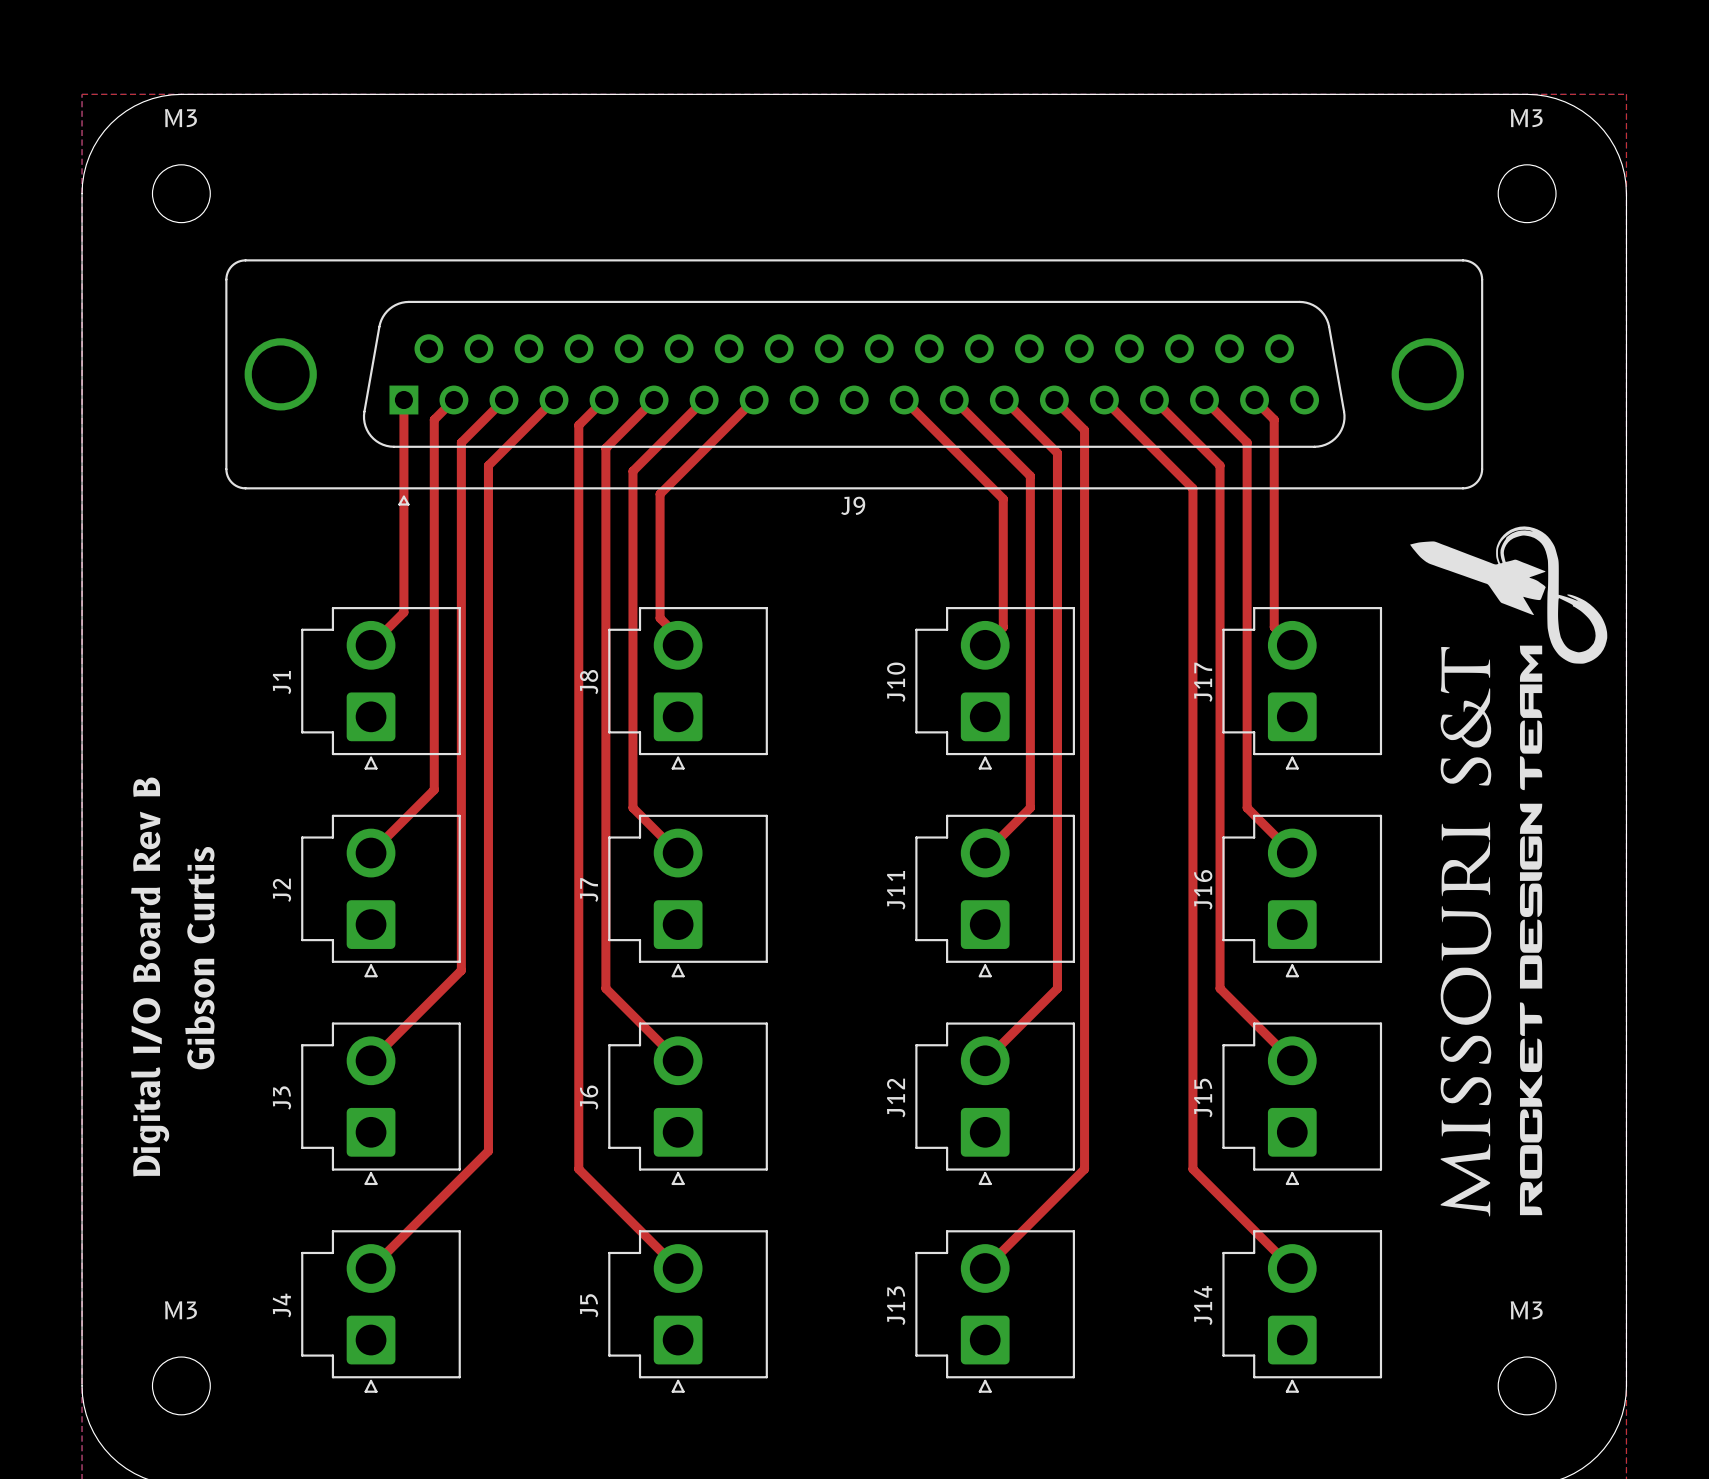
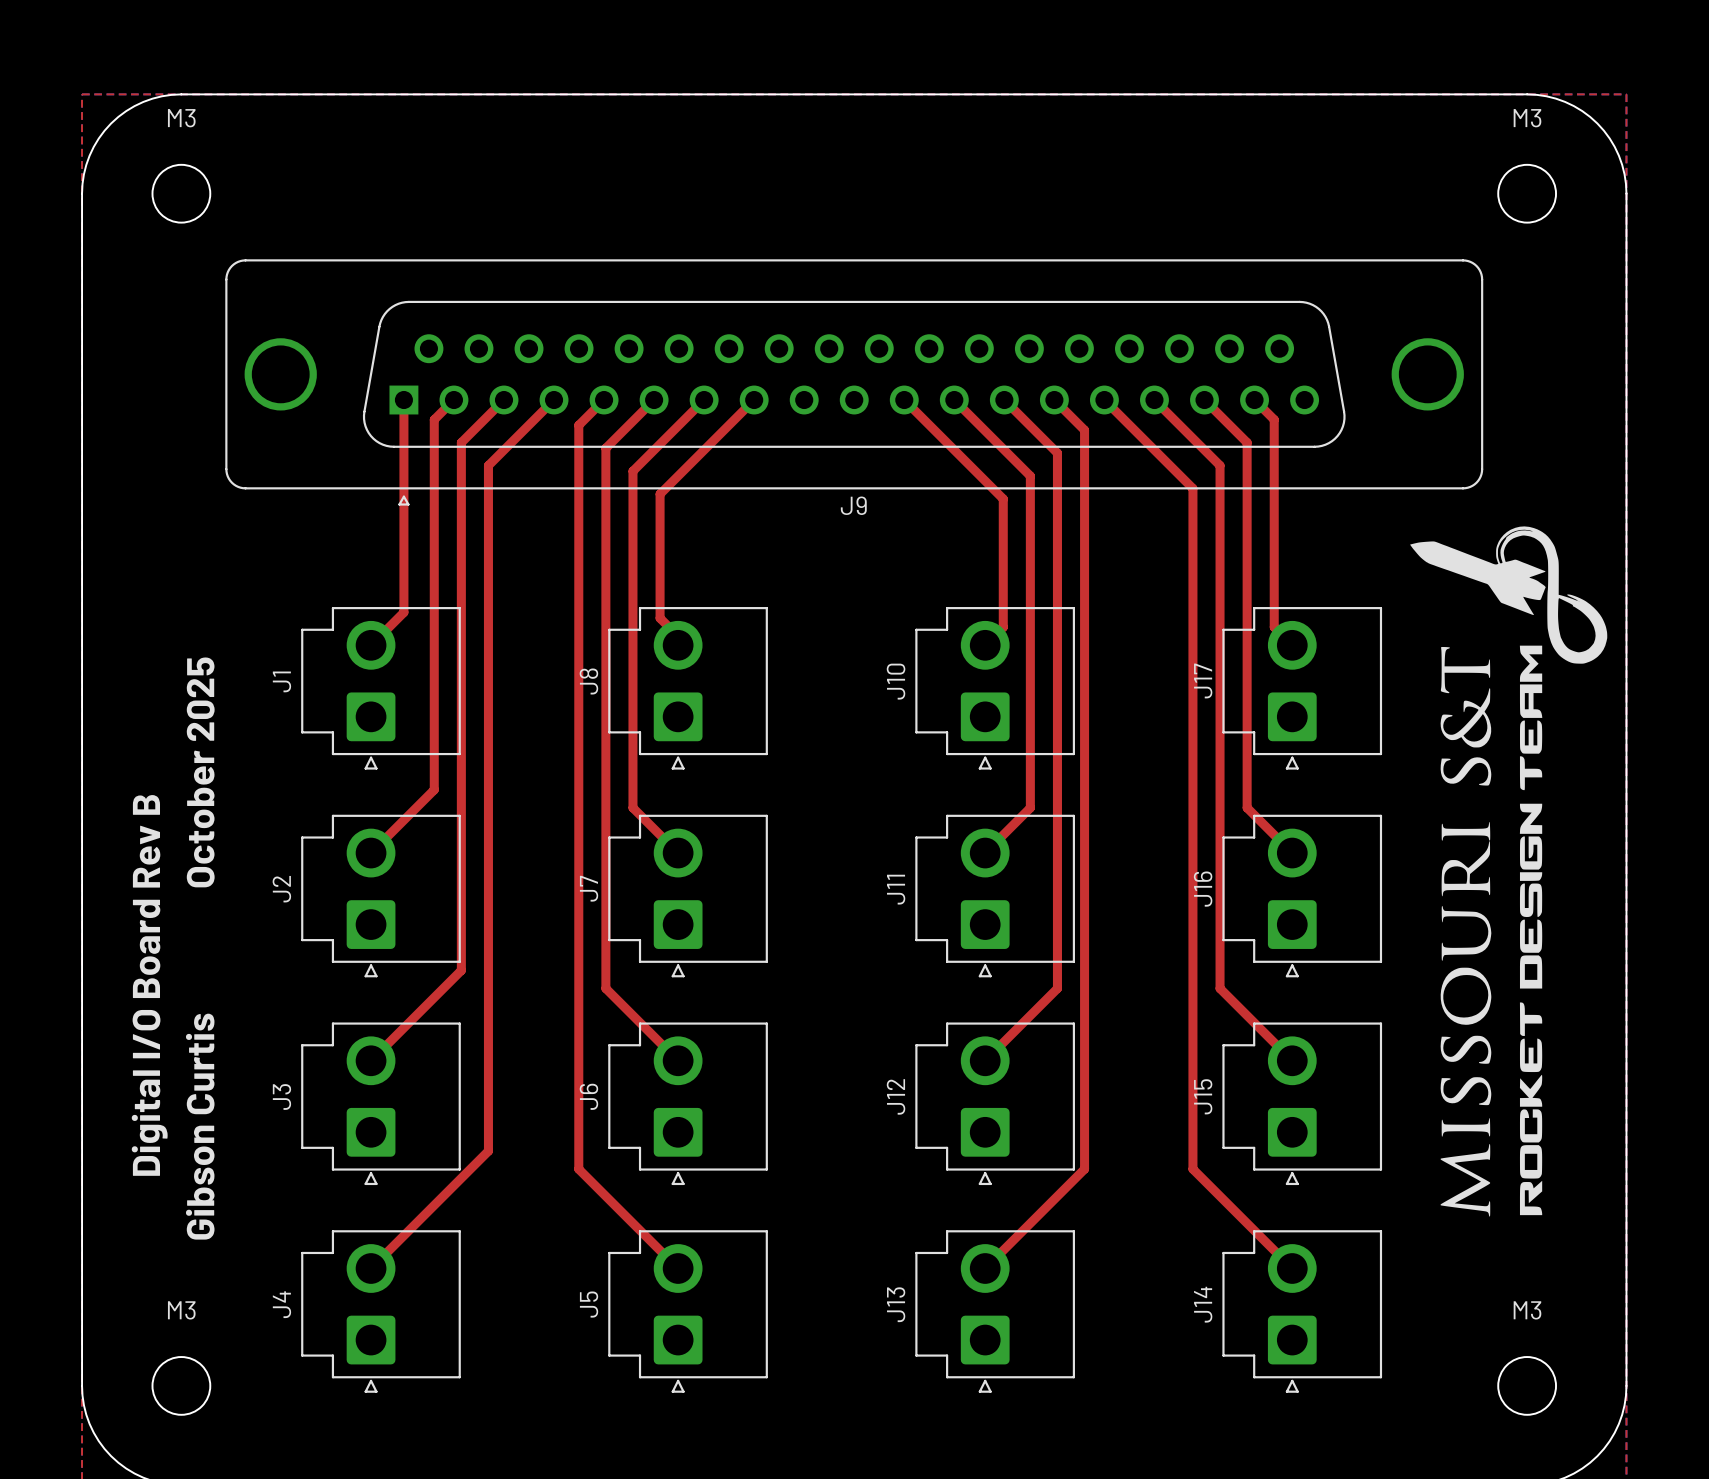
text: none -> October 2025 (200, 772)
text position: Gibson Curtis (199, 958) -> Gibson Curtis (200, 1126)

